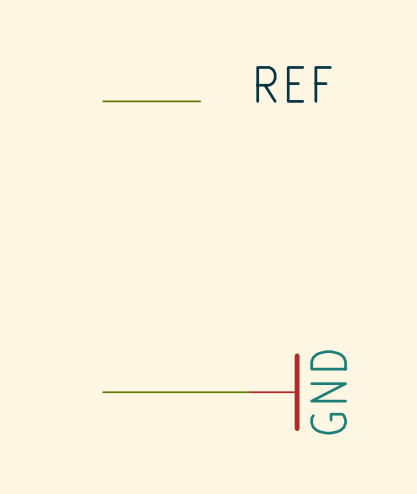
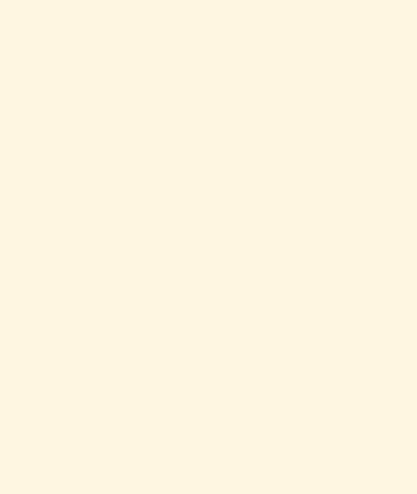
label: REF (294, 84) -> none
wire: (103, 101) (200, 101) -> none
wire: (103, 392) (248, 392) -> none
power symbol: GND (274, 392) -> none

